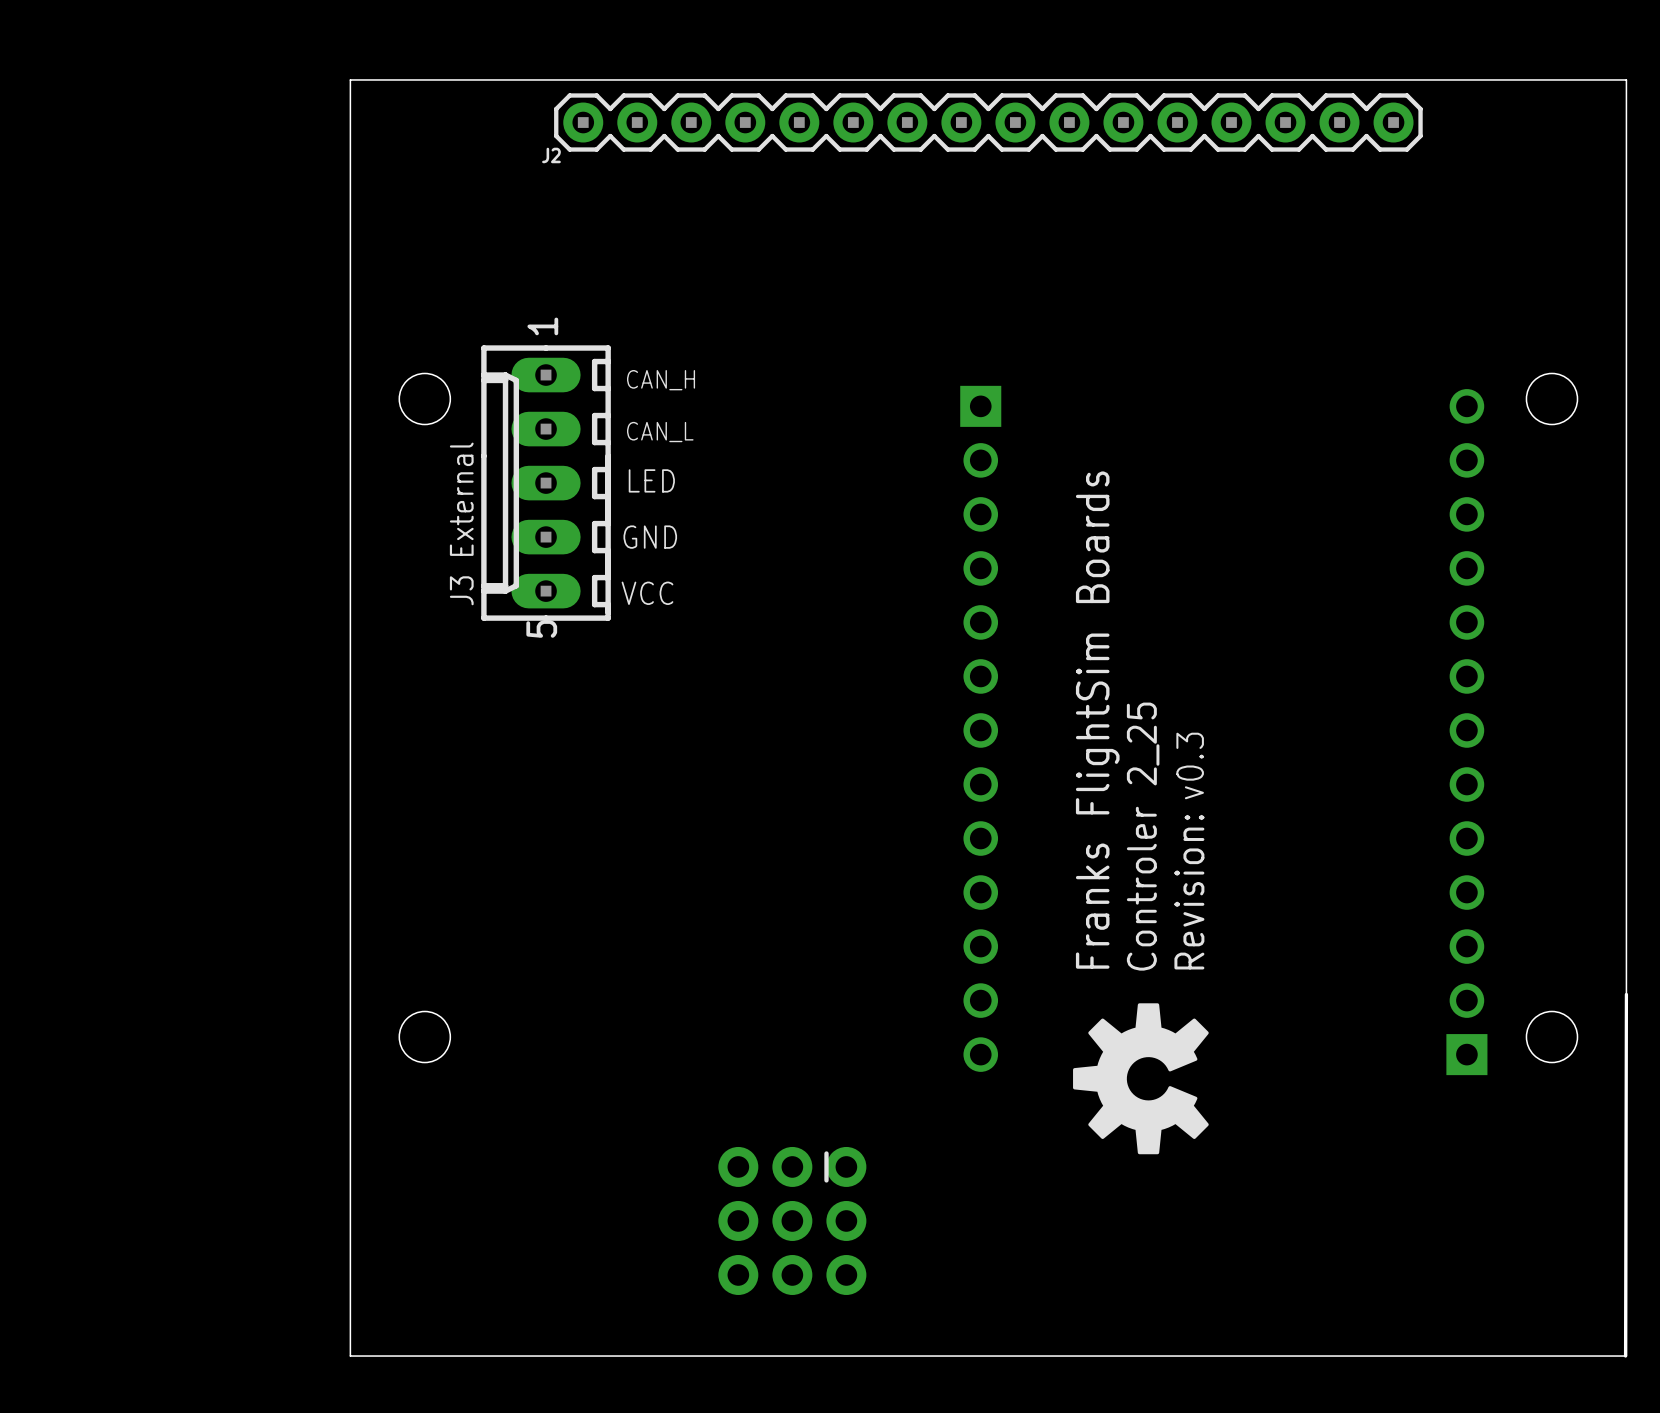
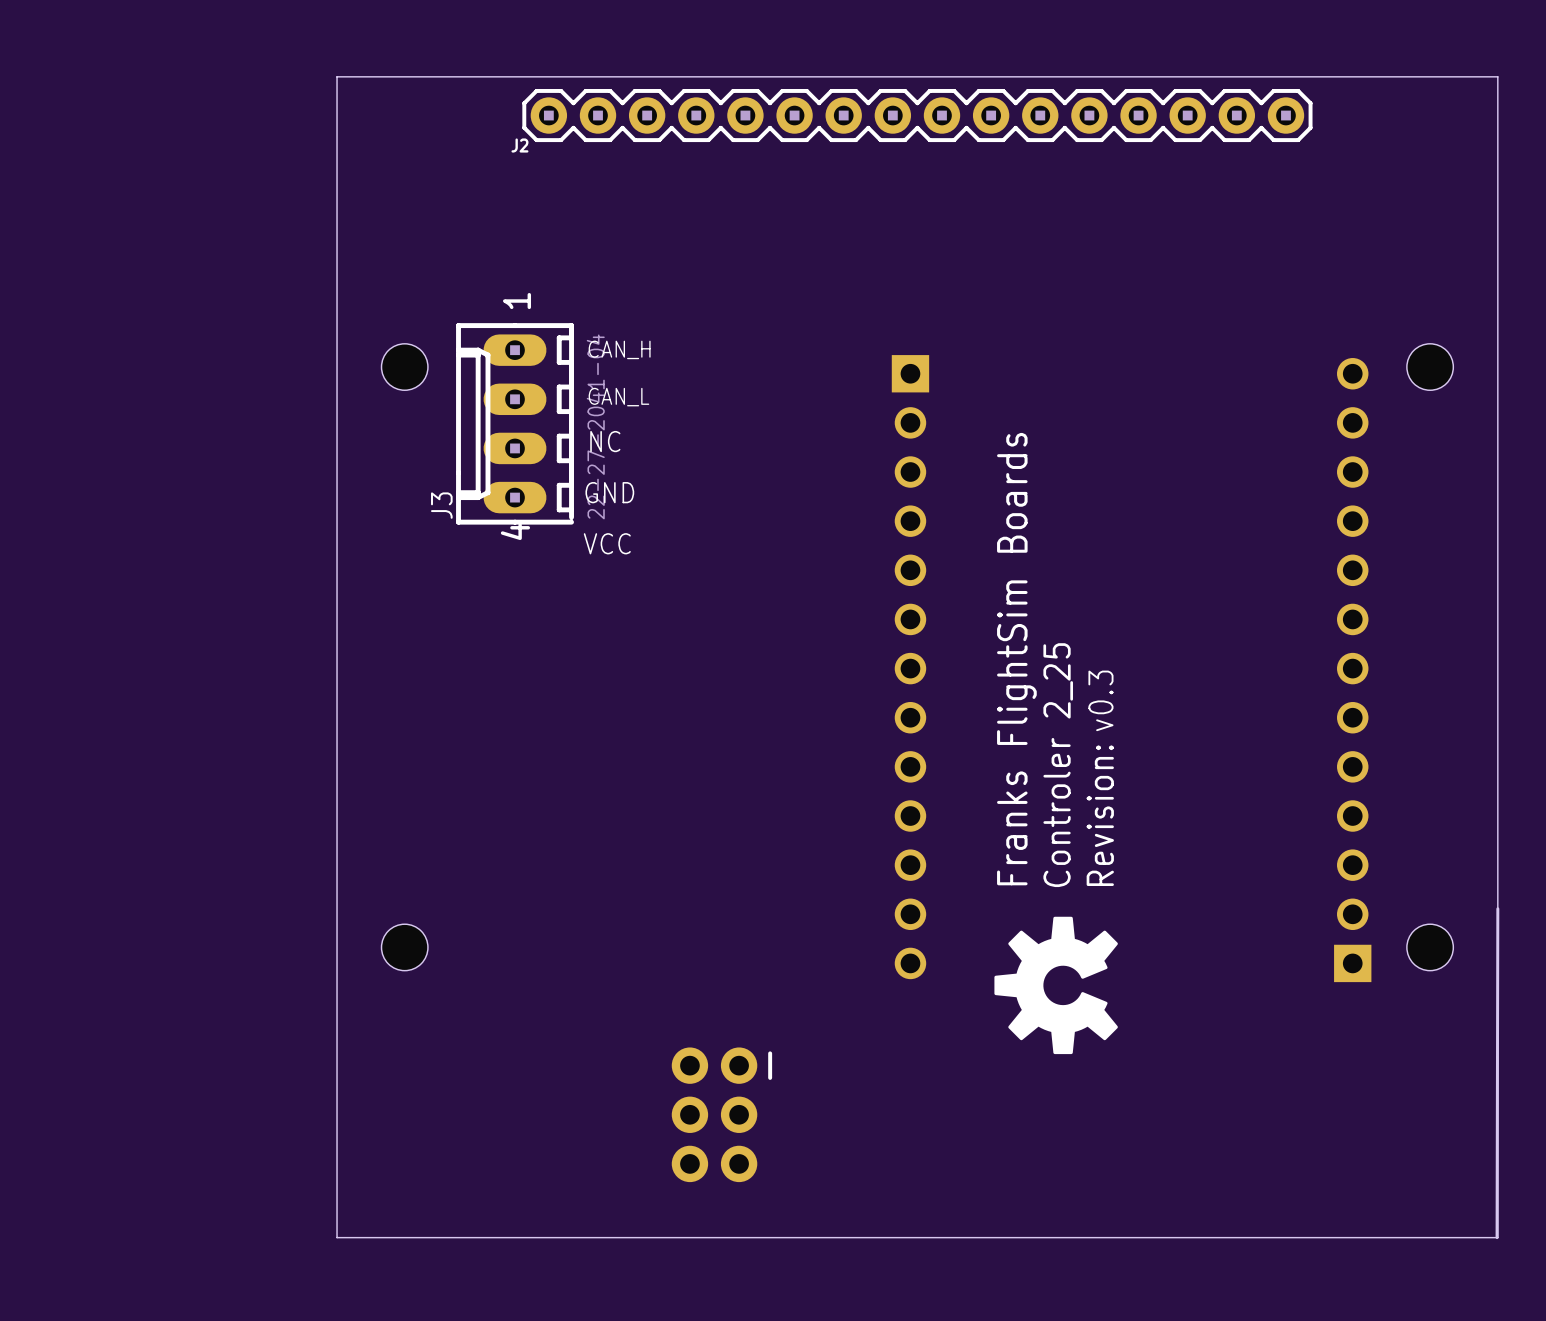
J3 footprint: [481, 345, 611, 621] -> [456, 323, 574, 525]
text: LED (651, 480) -> NC (605, 441)
J3 value: External (461, 499) -> 22-27-2041-04 (595, 426)
part: (846, 1220) -> none

